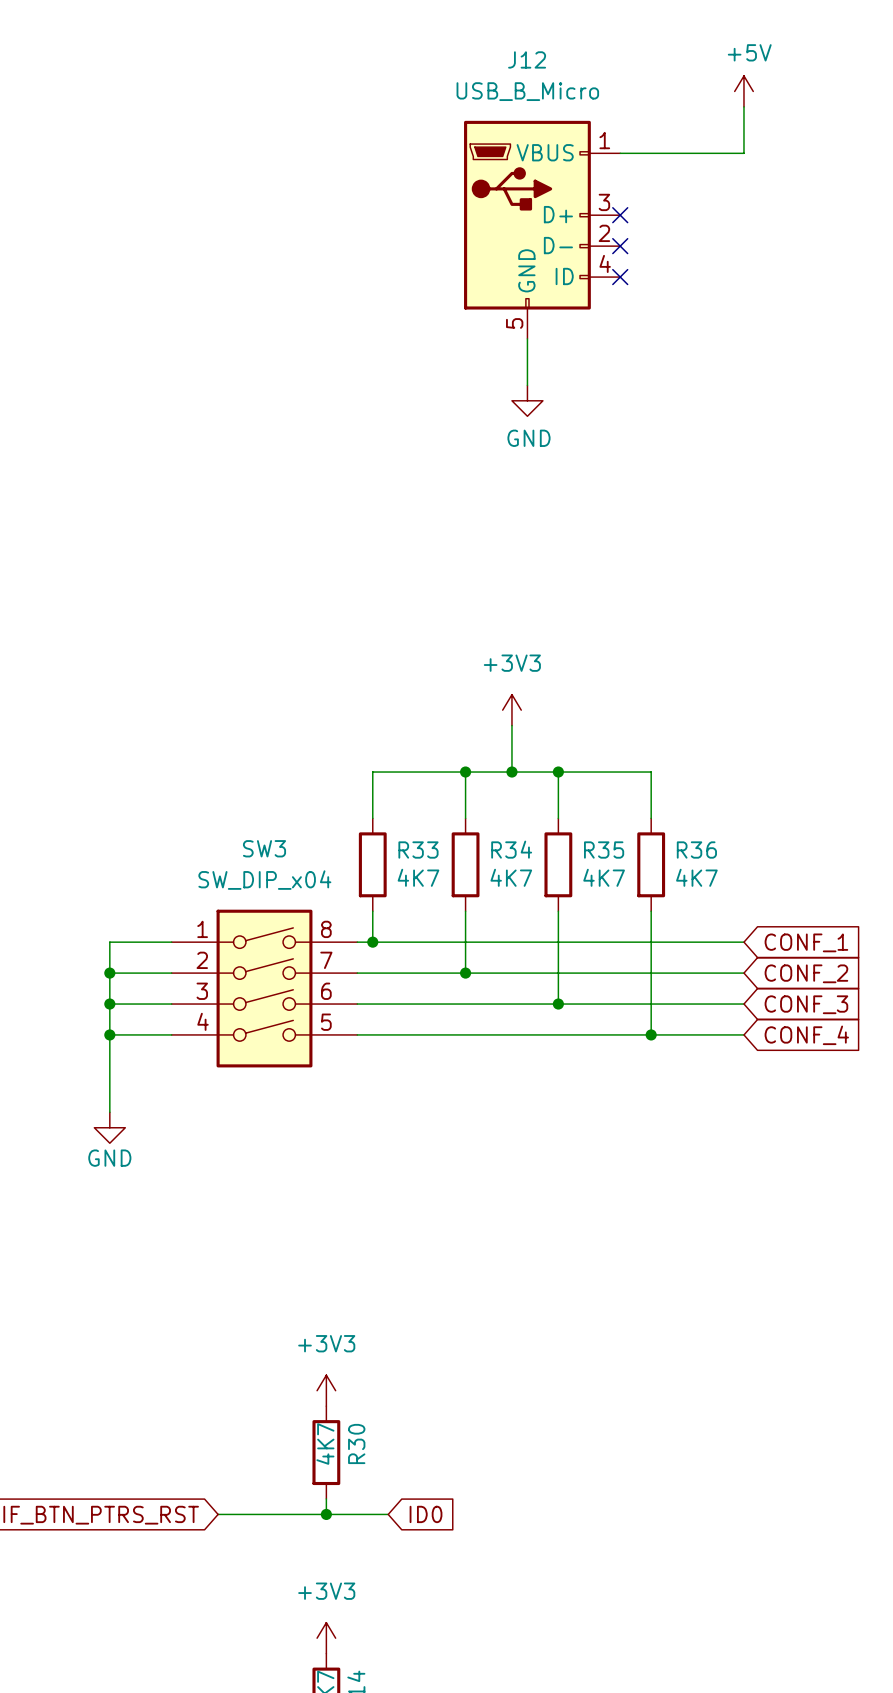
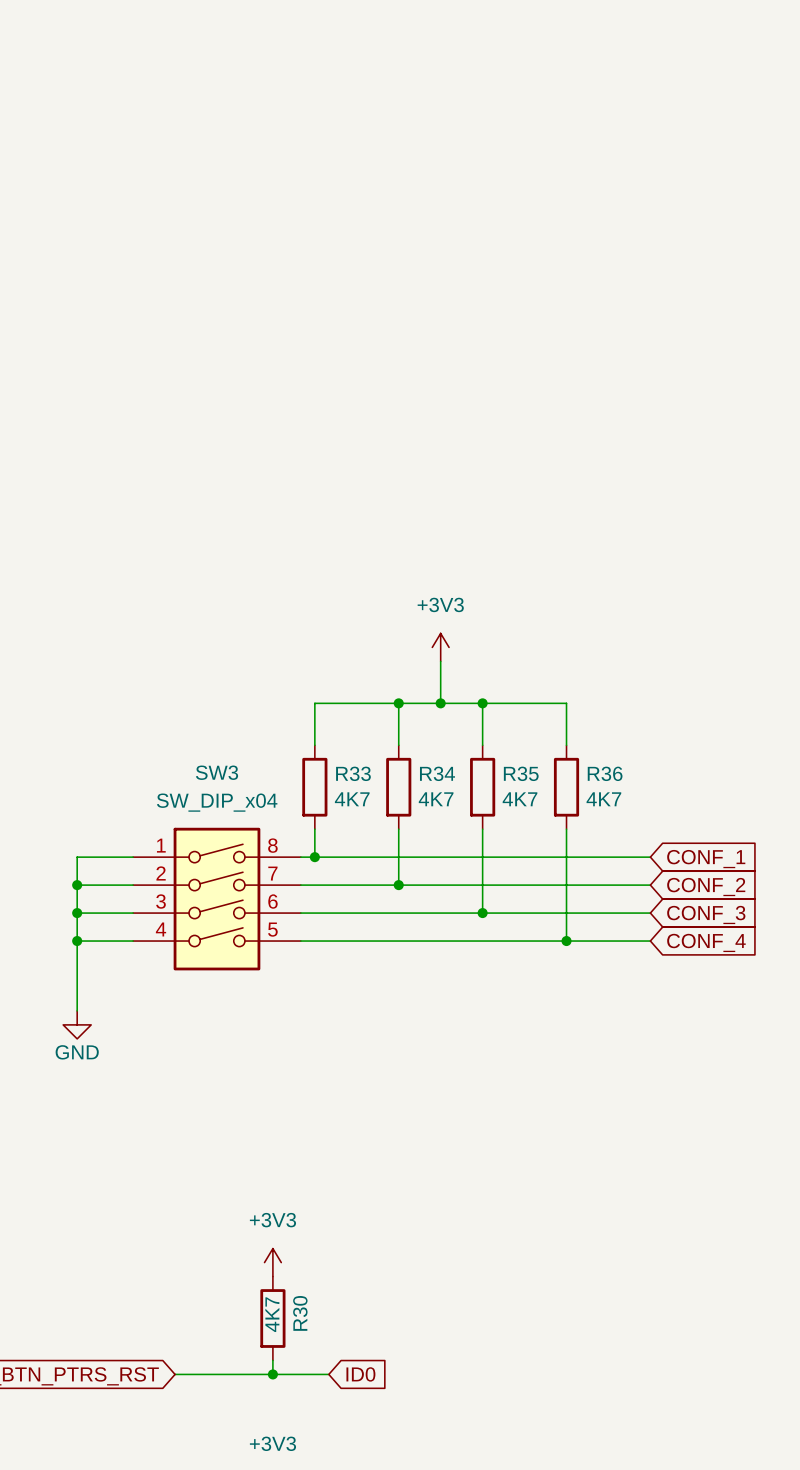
power symbol: +5V (743, 91) -> none
wire: (743, 106) (743, 153) (620, 153) -> none
no-connect mark: (620, 215) -> none
J12: USB_B_Micro (542, 229) -> none
no-connect mark: (620, 246) -> none
no-connect mark: (620, 277) -> none
wire: (527, 338) (527, 385) -> none
power symbol: GND (527, 400) -> none

